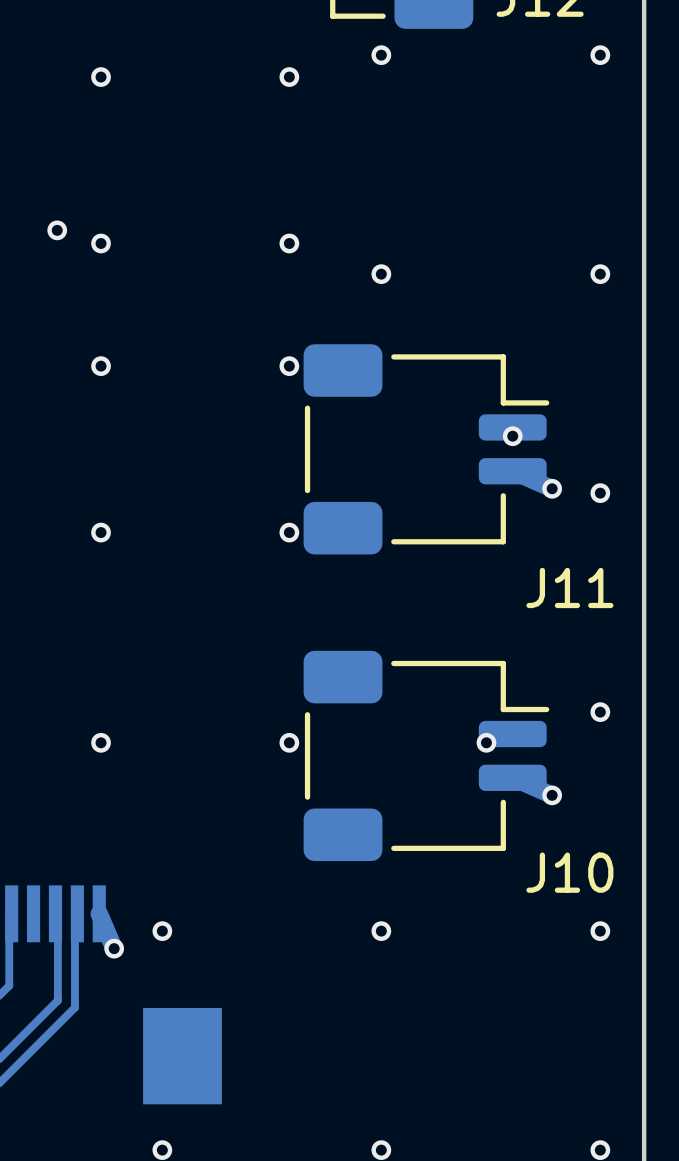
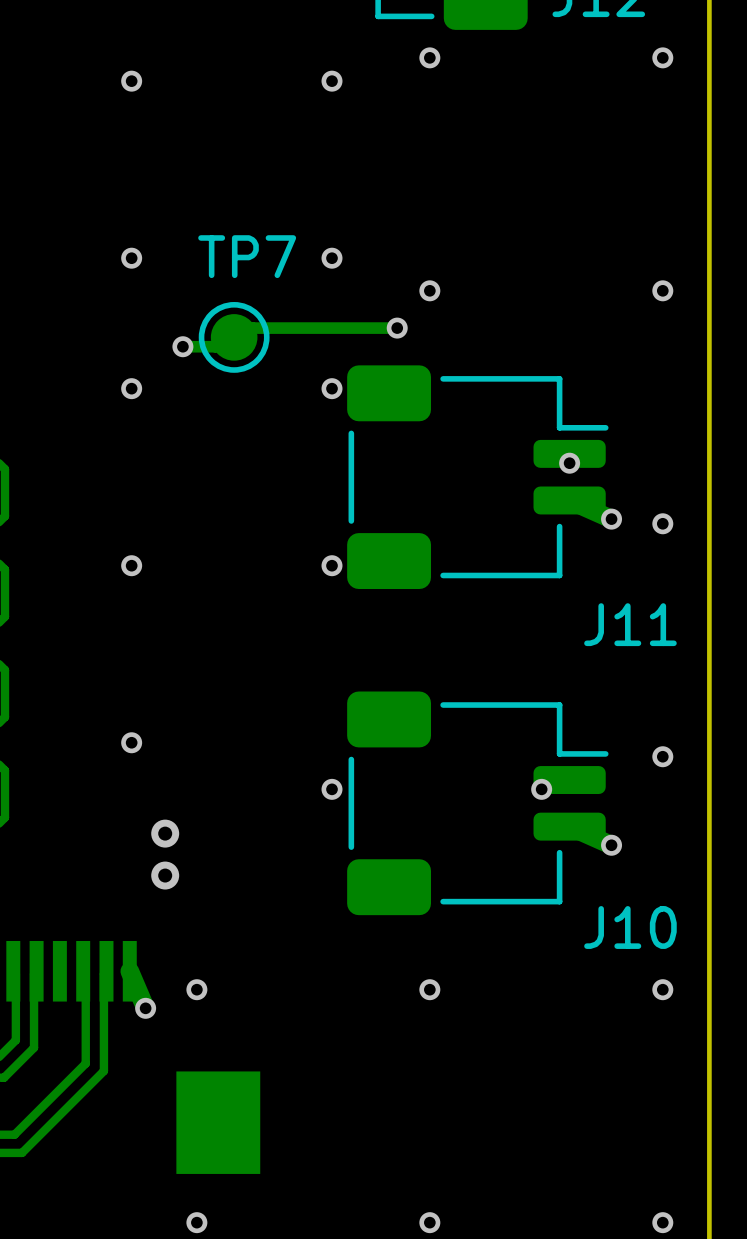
via position: (57, 230) -> (182, 346)
track: none -> (397, 328) (252, 328) (215, 346) (182, 346)
via: none -> (397, 328)
TP7: none -> (234, 337)
via position: (101, 742) -> (131, 742)
via: none -> (165, 833)
via: none -> (165, 875)

